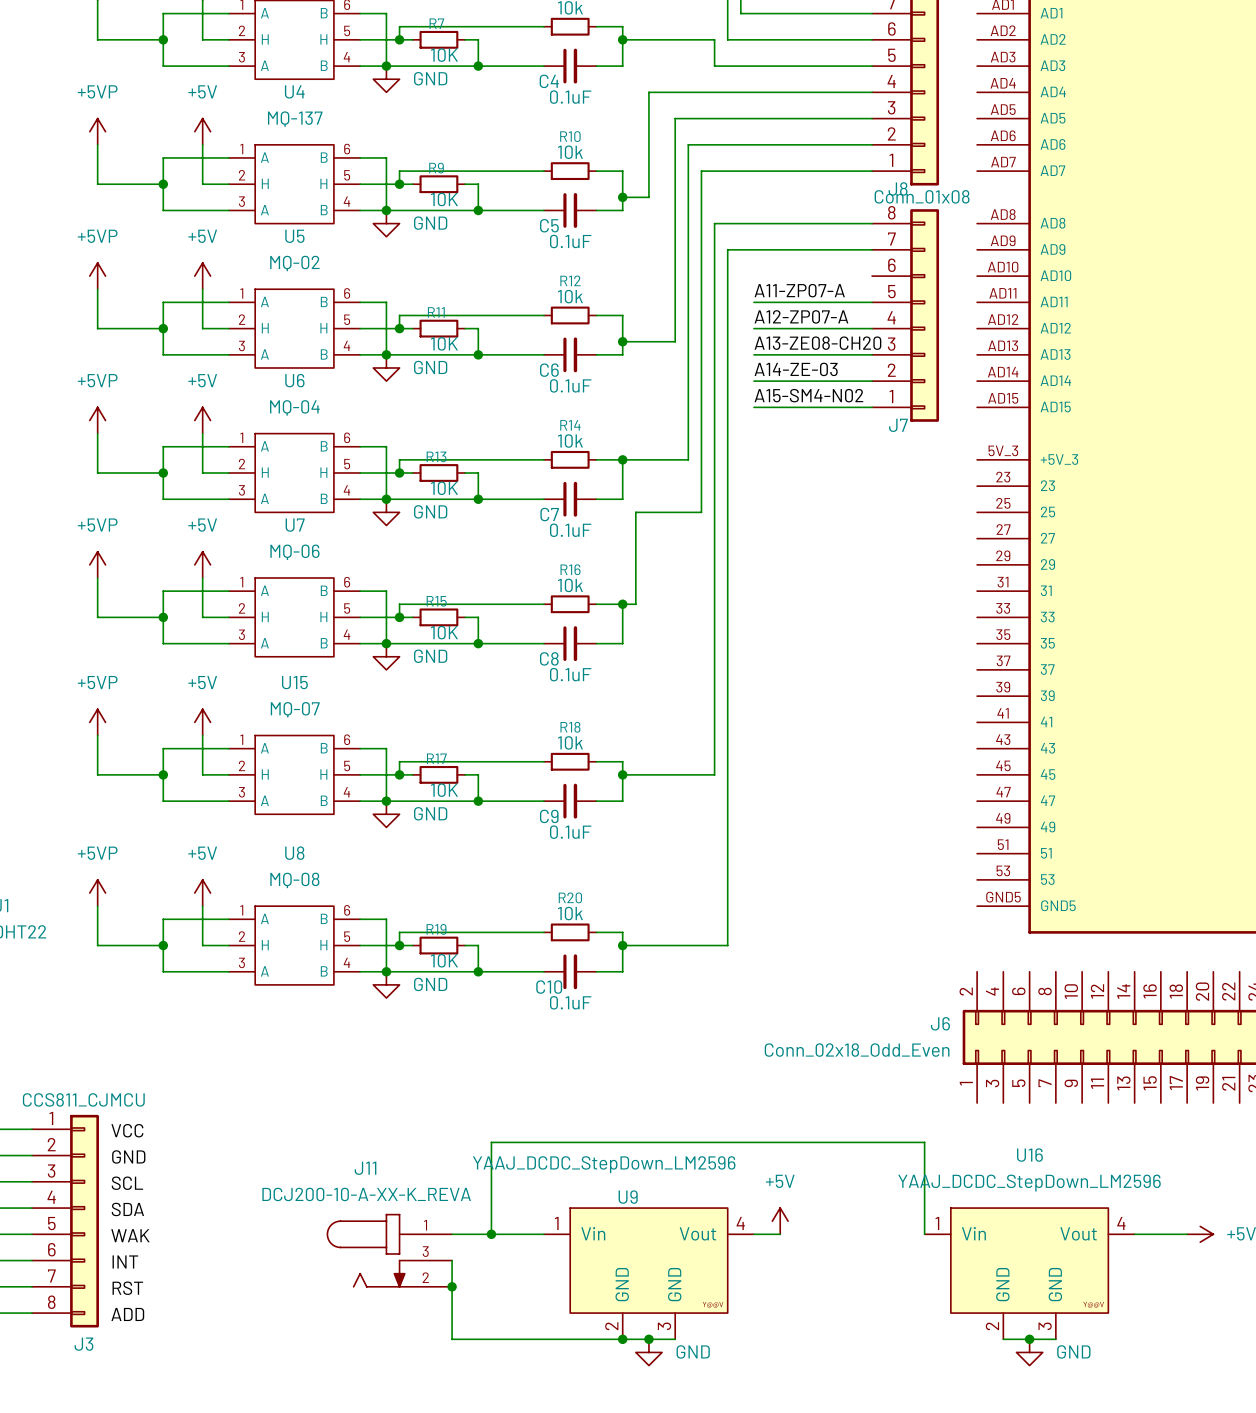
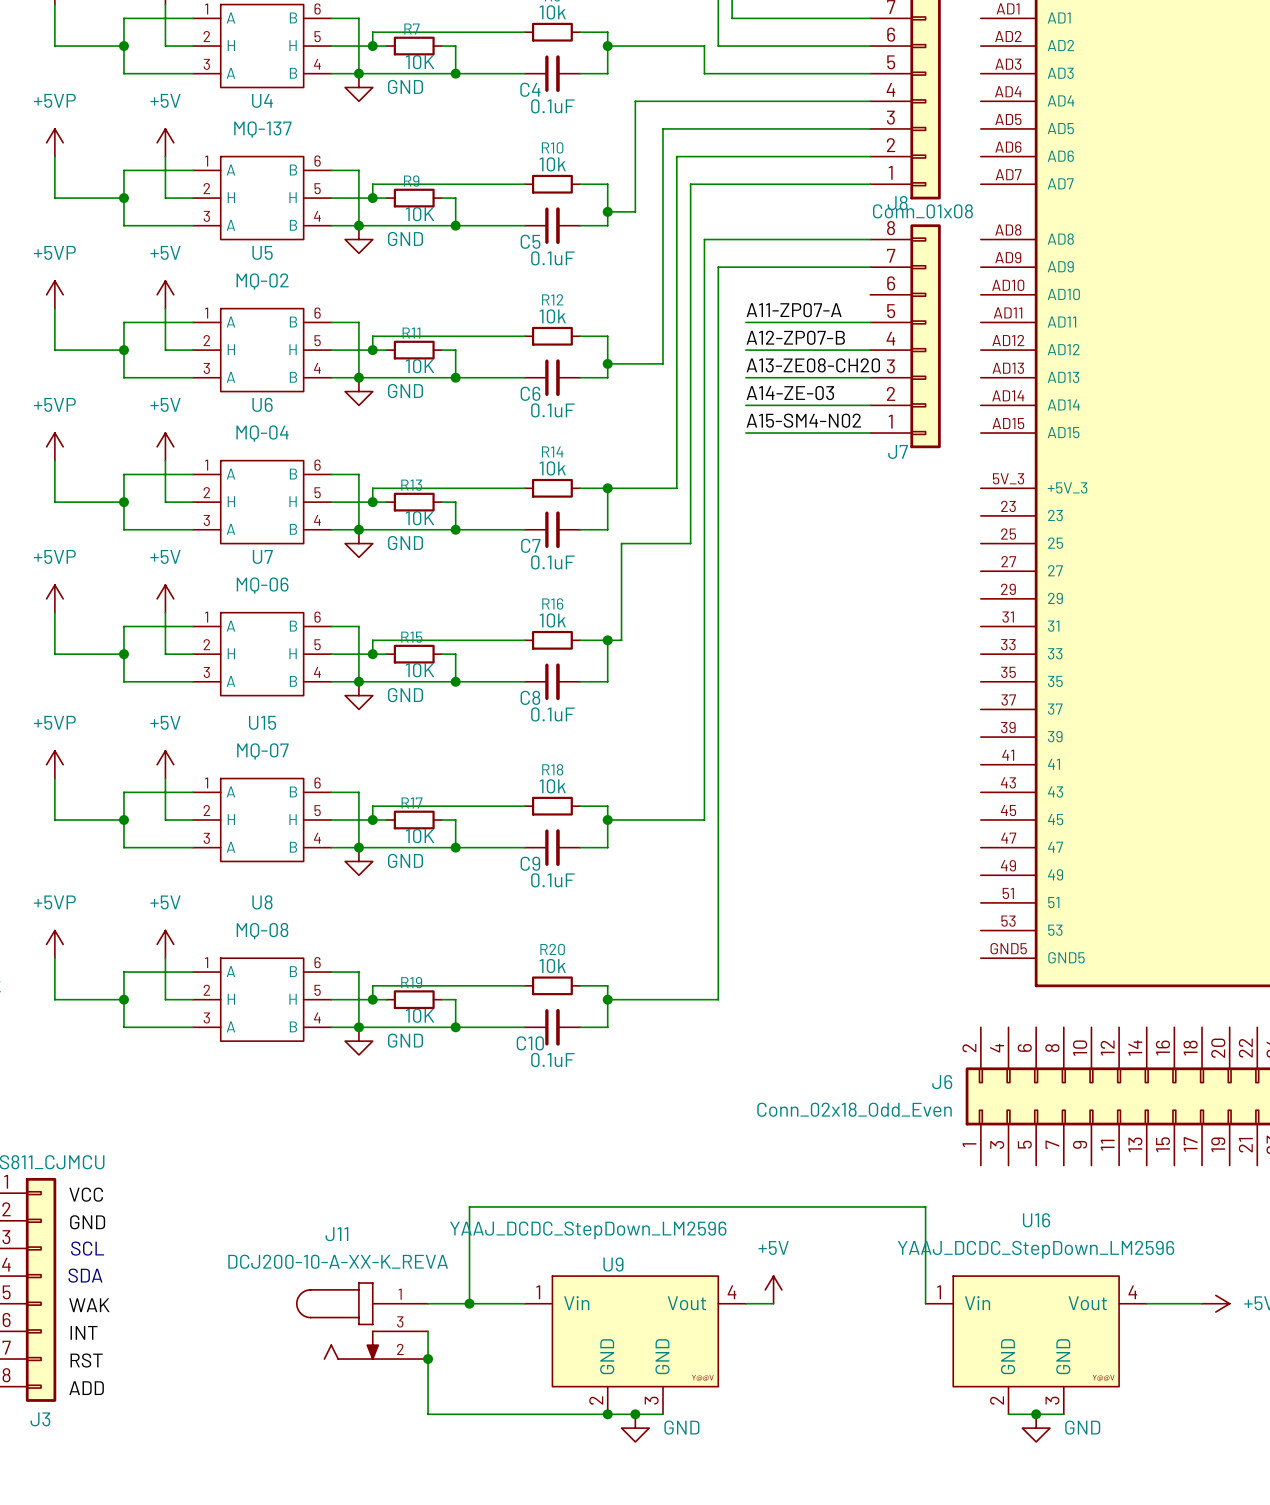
label: A12-ZP07-A (801, 316) -> A12-ZP07-B (795, 337)
text: none -> SCL (87, 1248)
label: SCL (127, 1183) -> none
text: none -> SDA (85, 1275)
label: SDA (127, 1209) -> none

